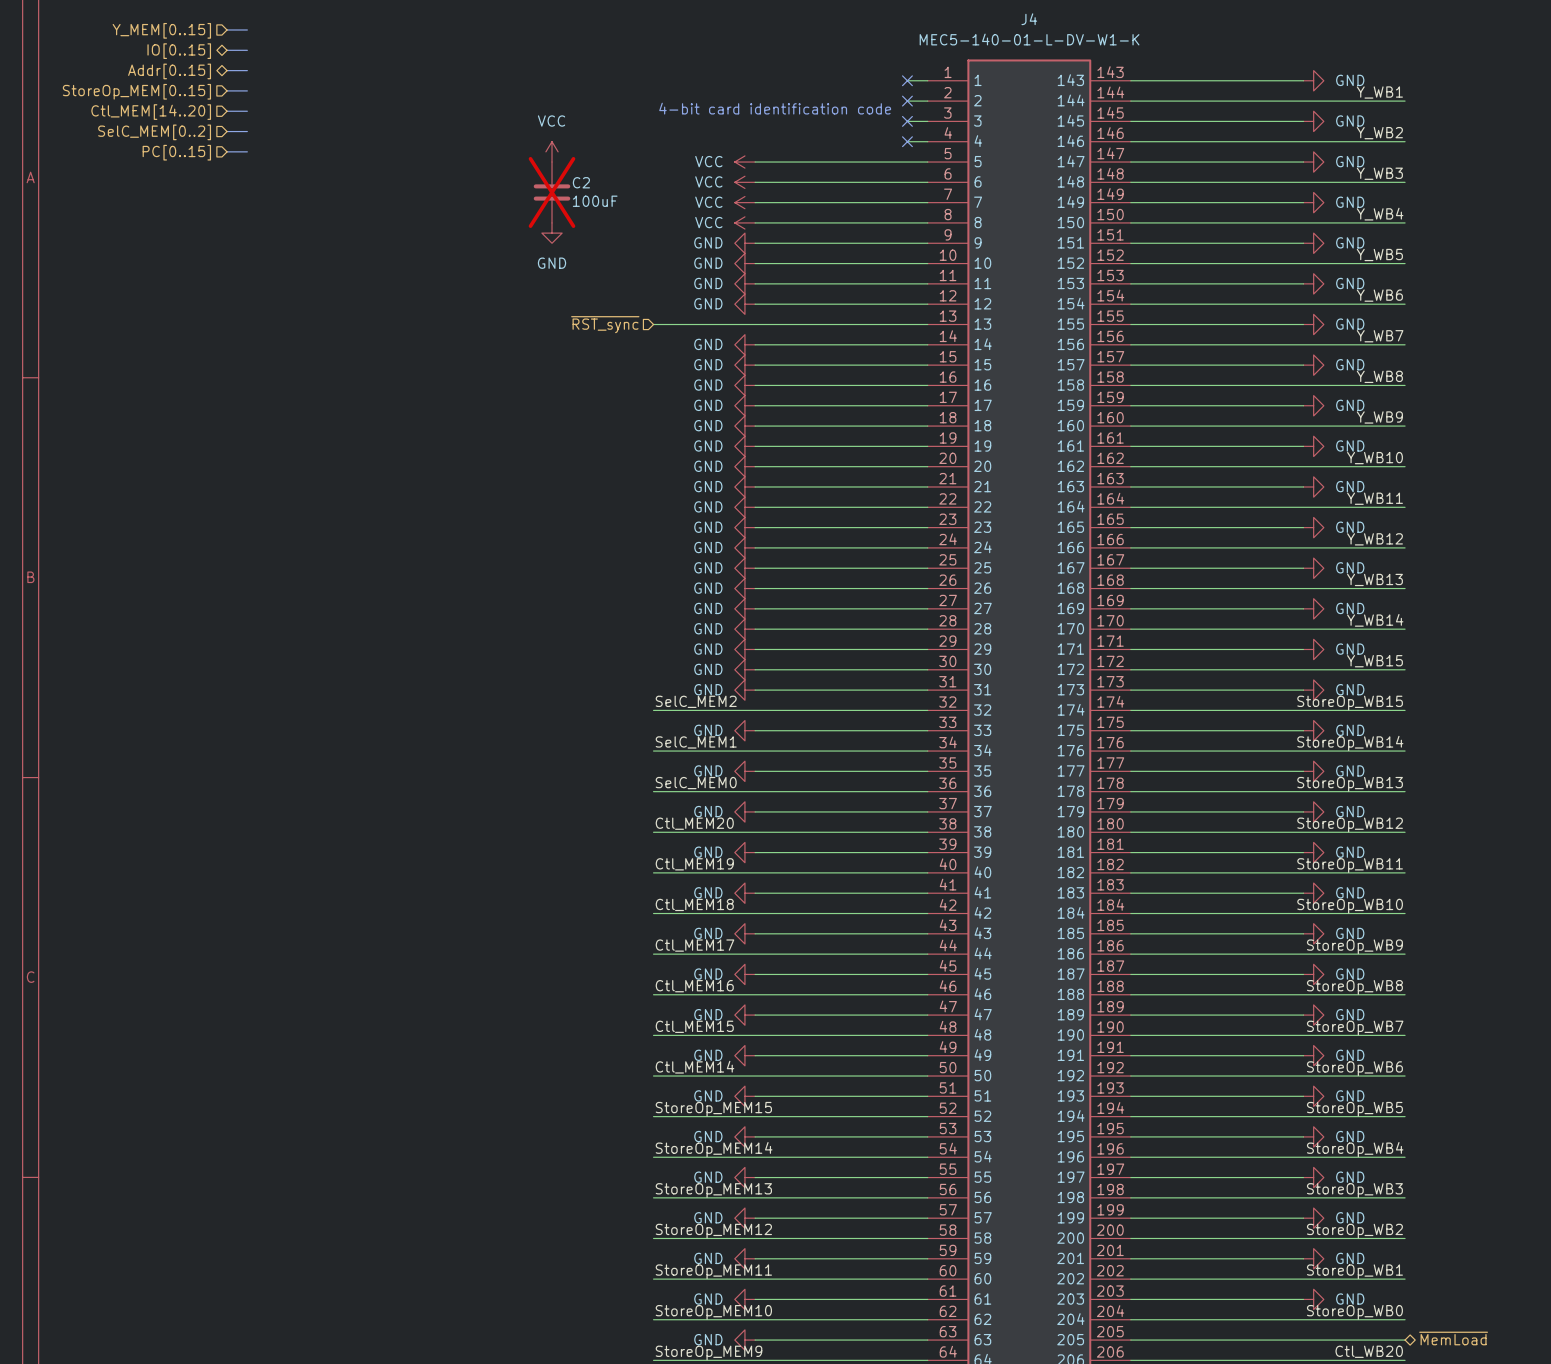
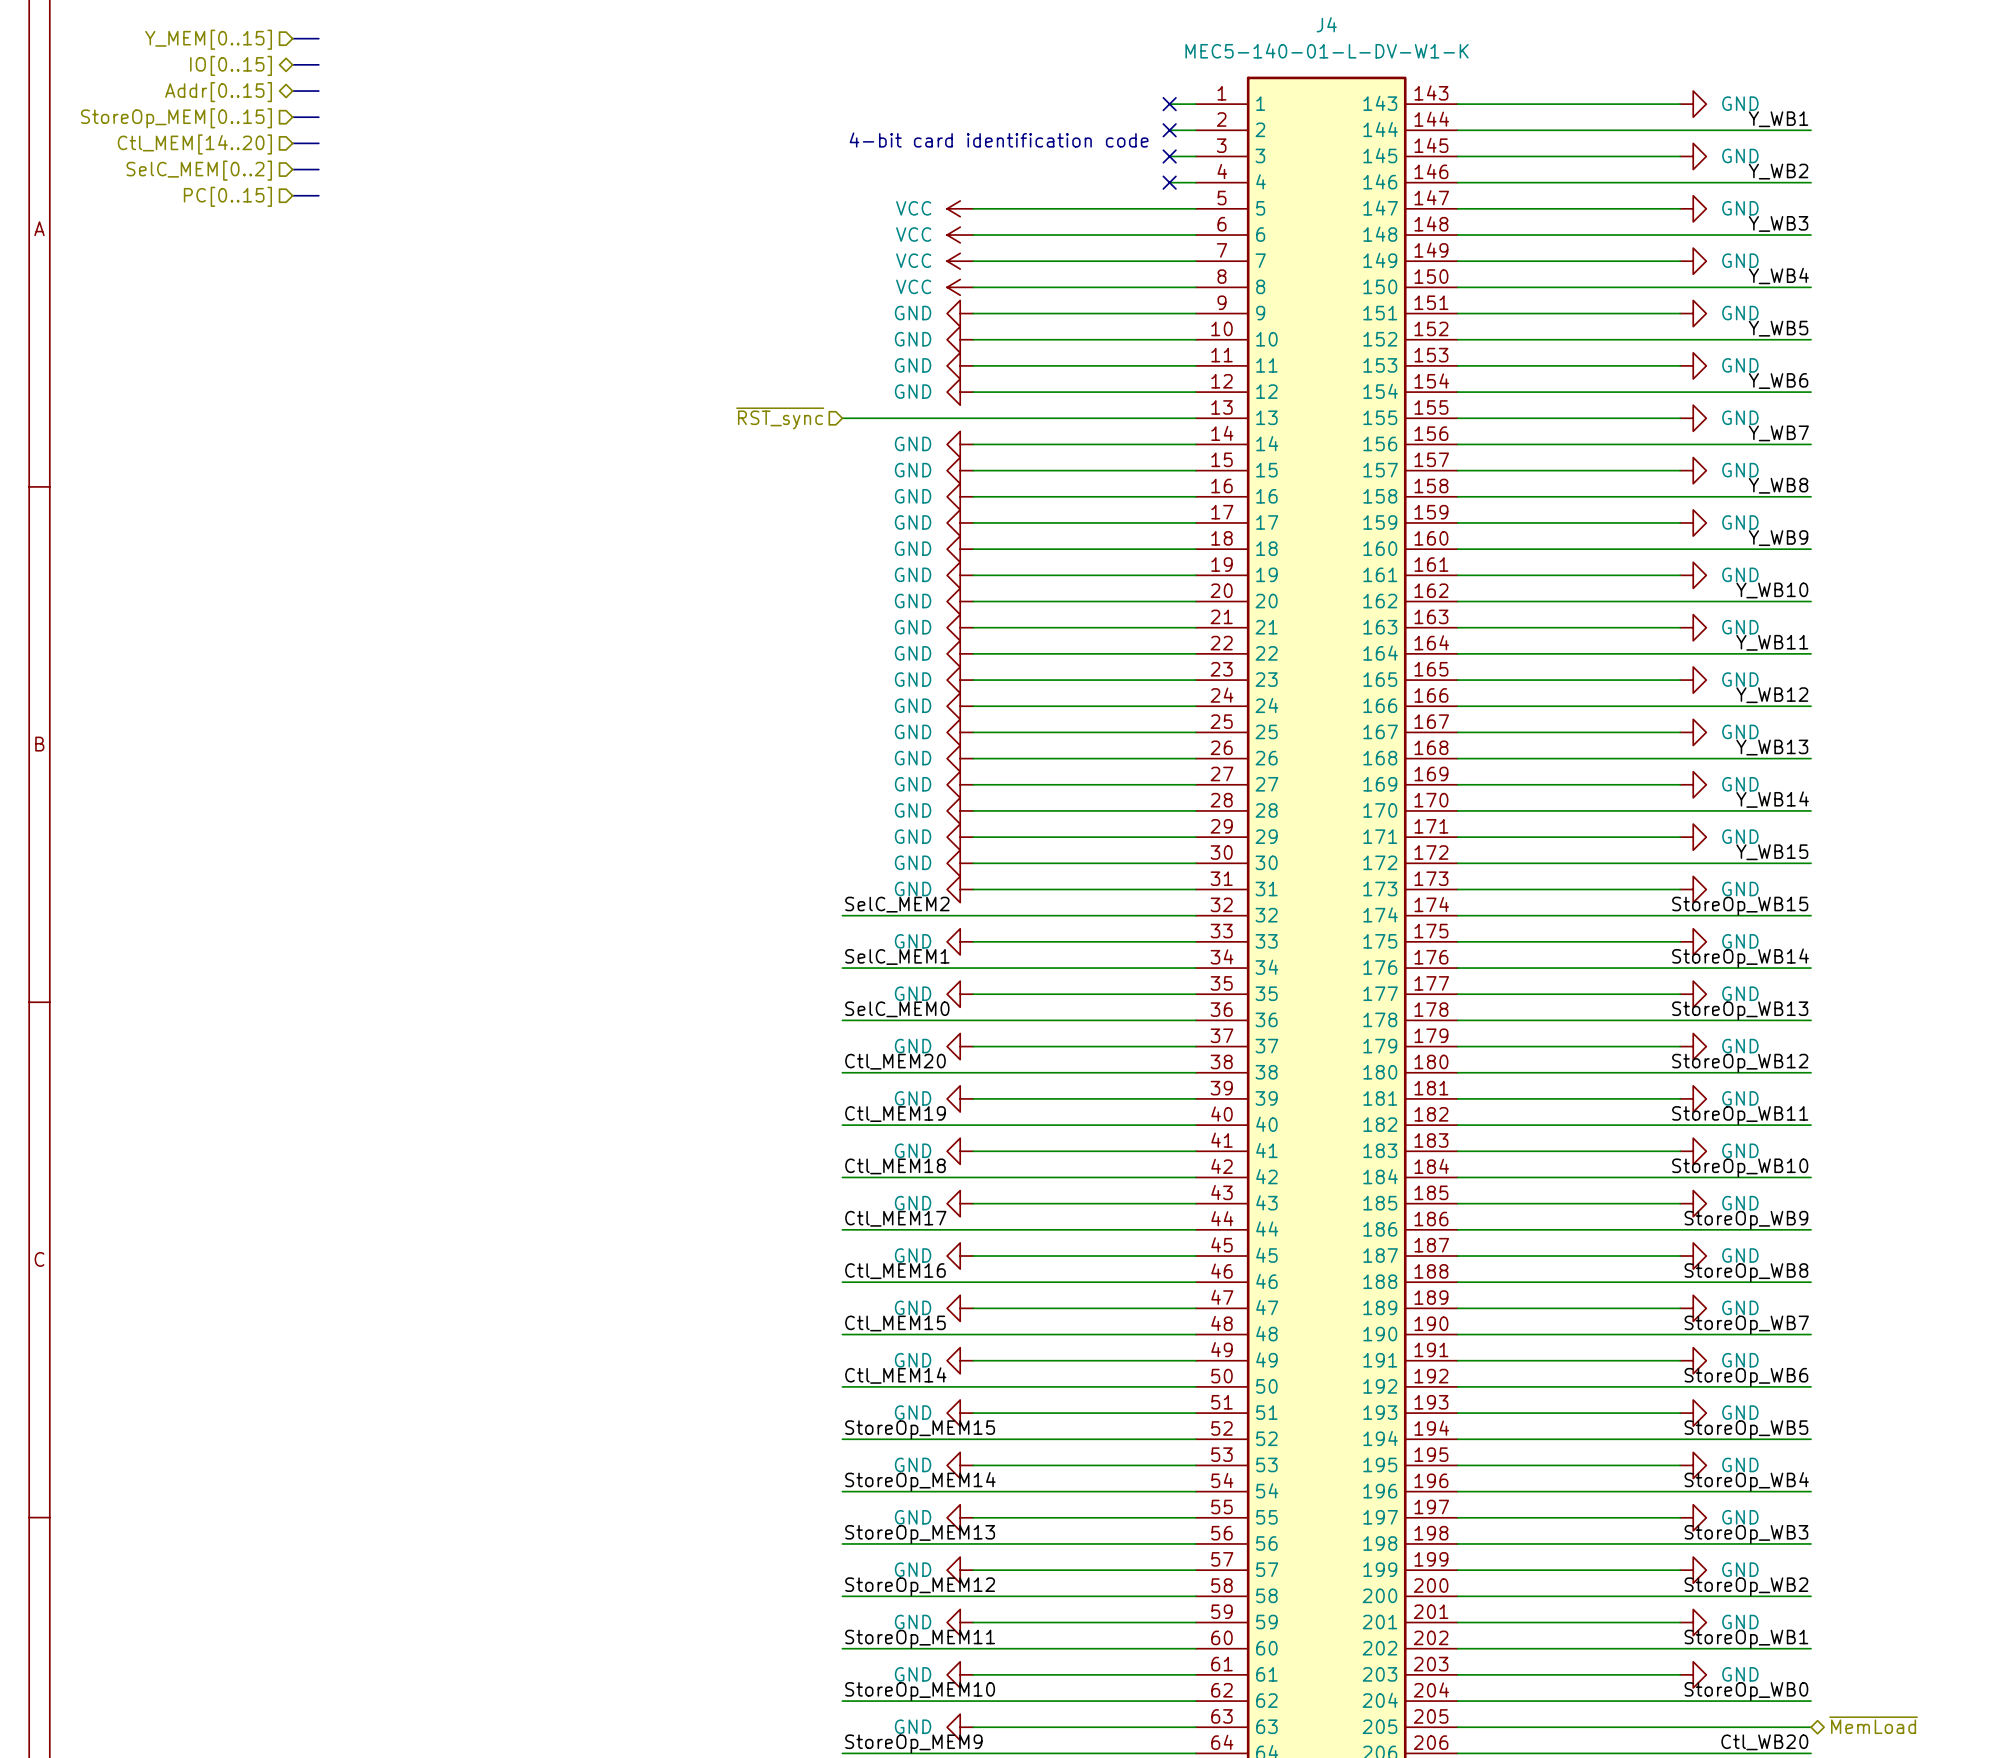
power symbol: VCC (552, 151) -> none
C2: 100uF (552, 192) -> none
power symbol: GND (552, 233) -> none

